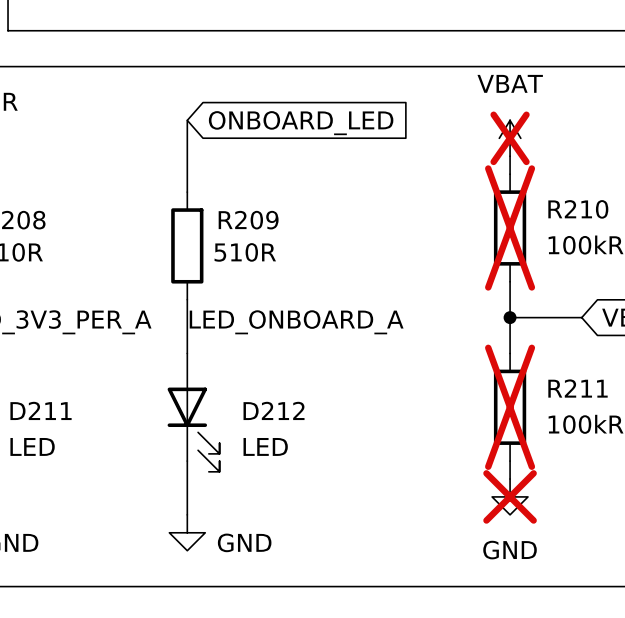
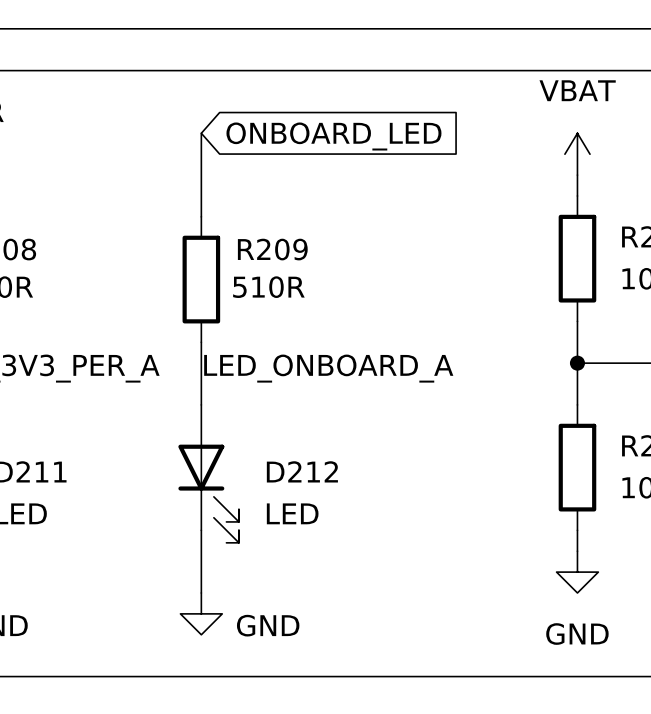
power symbol do-not-place cross: (510, 138) -> none
R210 do-not-place cross: (510, 227) -> none
R211 do-not-place cross: (510, 407) -> none
power symbol do-not-place cross: (510, 496) -> none

